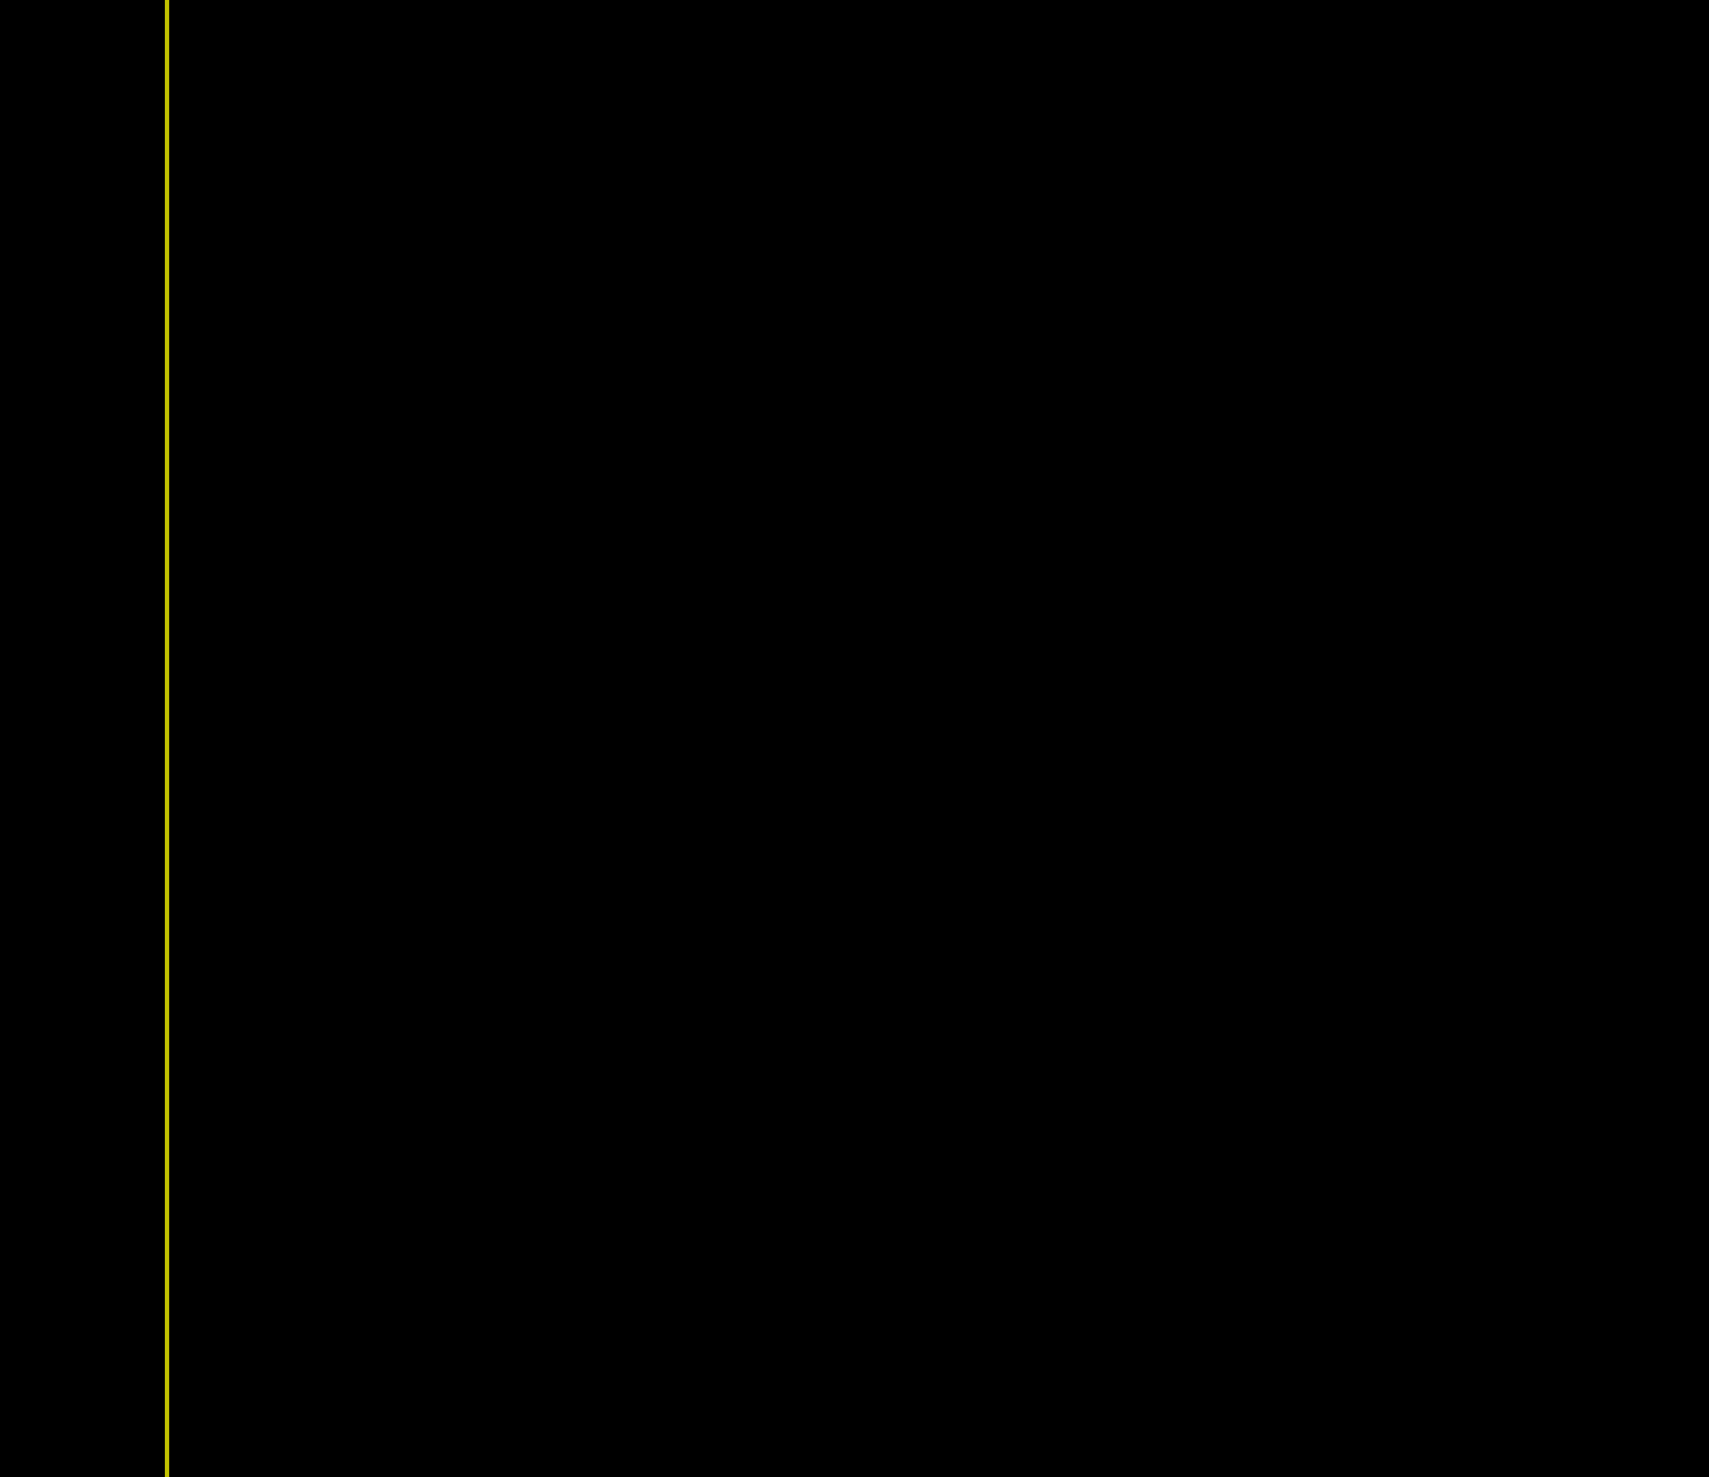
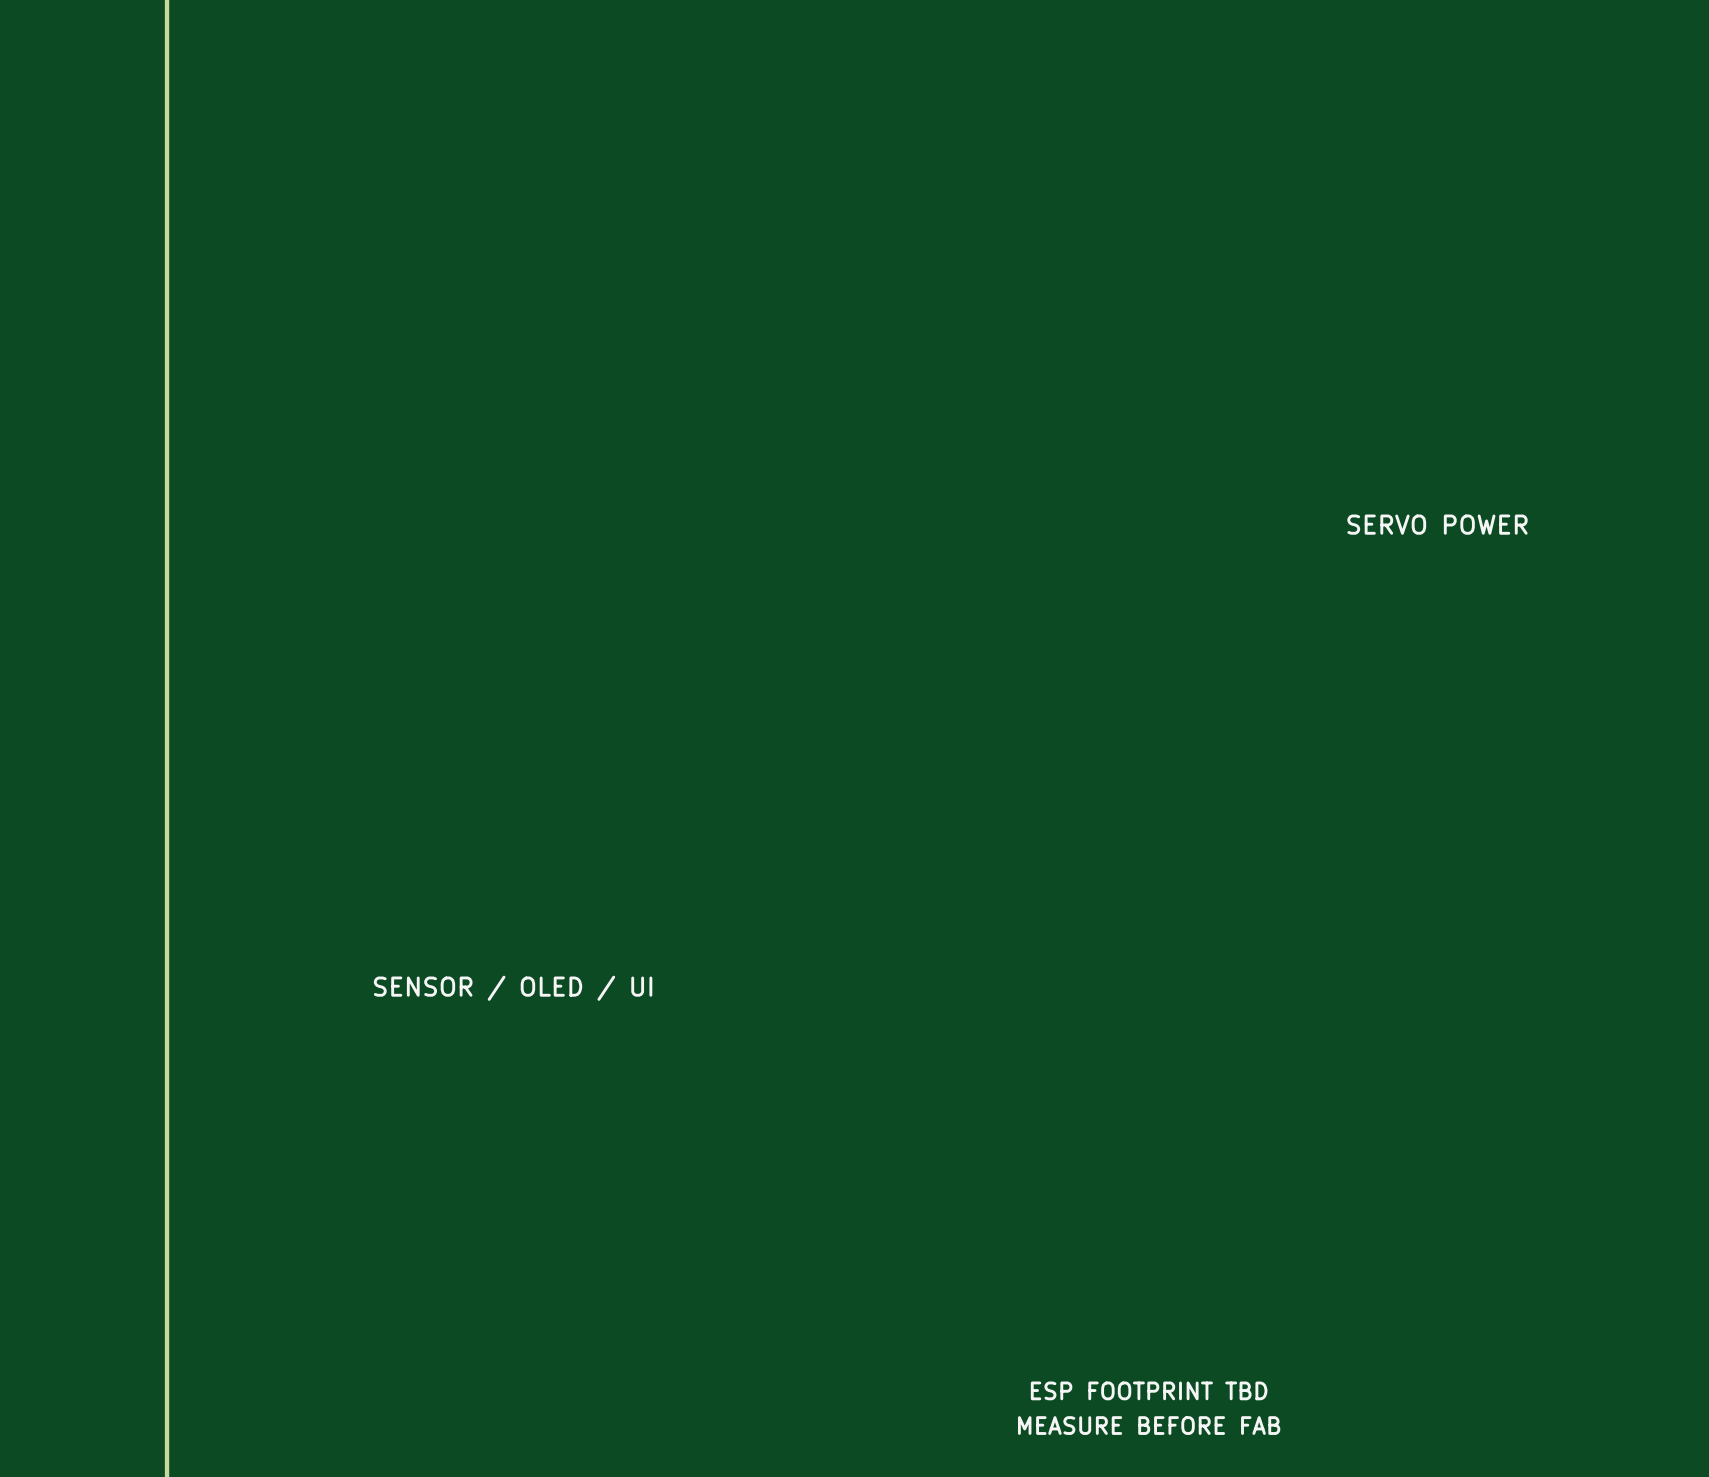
text: none -> SERVO POWER (1437, 524)
text: none -> SENSOR / OLED / UI (513, 988)
text: none -> ESP FOOTPRINT TBD (1149, 1390)
text: none -> MEASURE BEFORE FAB (1149, 1425)

